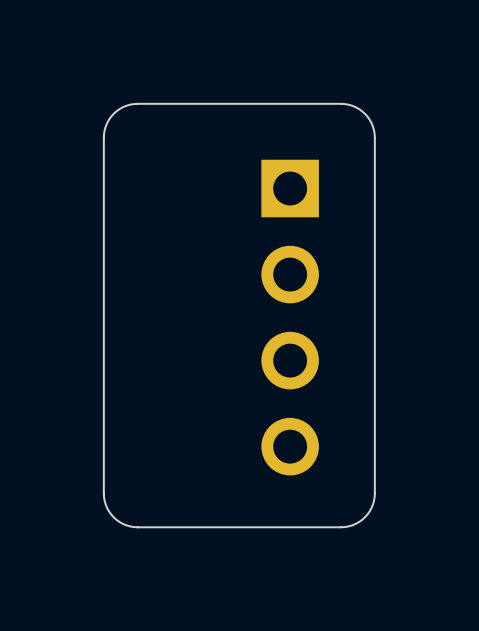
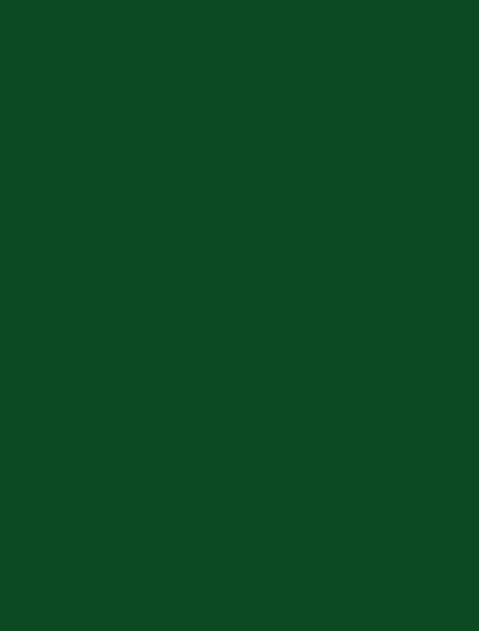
board edge: (340, 103) (133, 104) (116, 111) (107, 123) (103, 137) (103, 493) (109, 511) (123, 523) (137, 527) (344, 527) (358, 522) (371, 508) (374, 493) (374, 133) (369, 119) (362, 111) (352, 105) (340, 103) -> none
part: (290, 317) -> none

